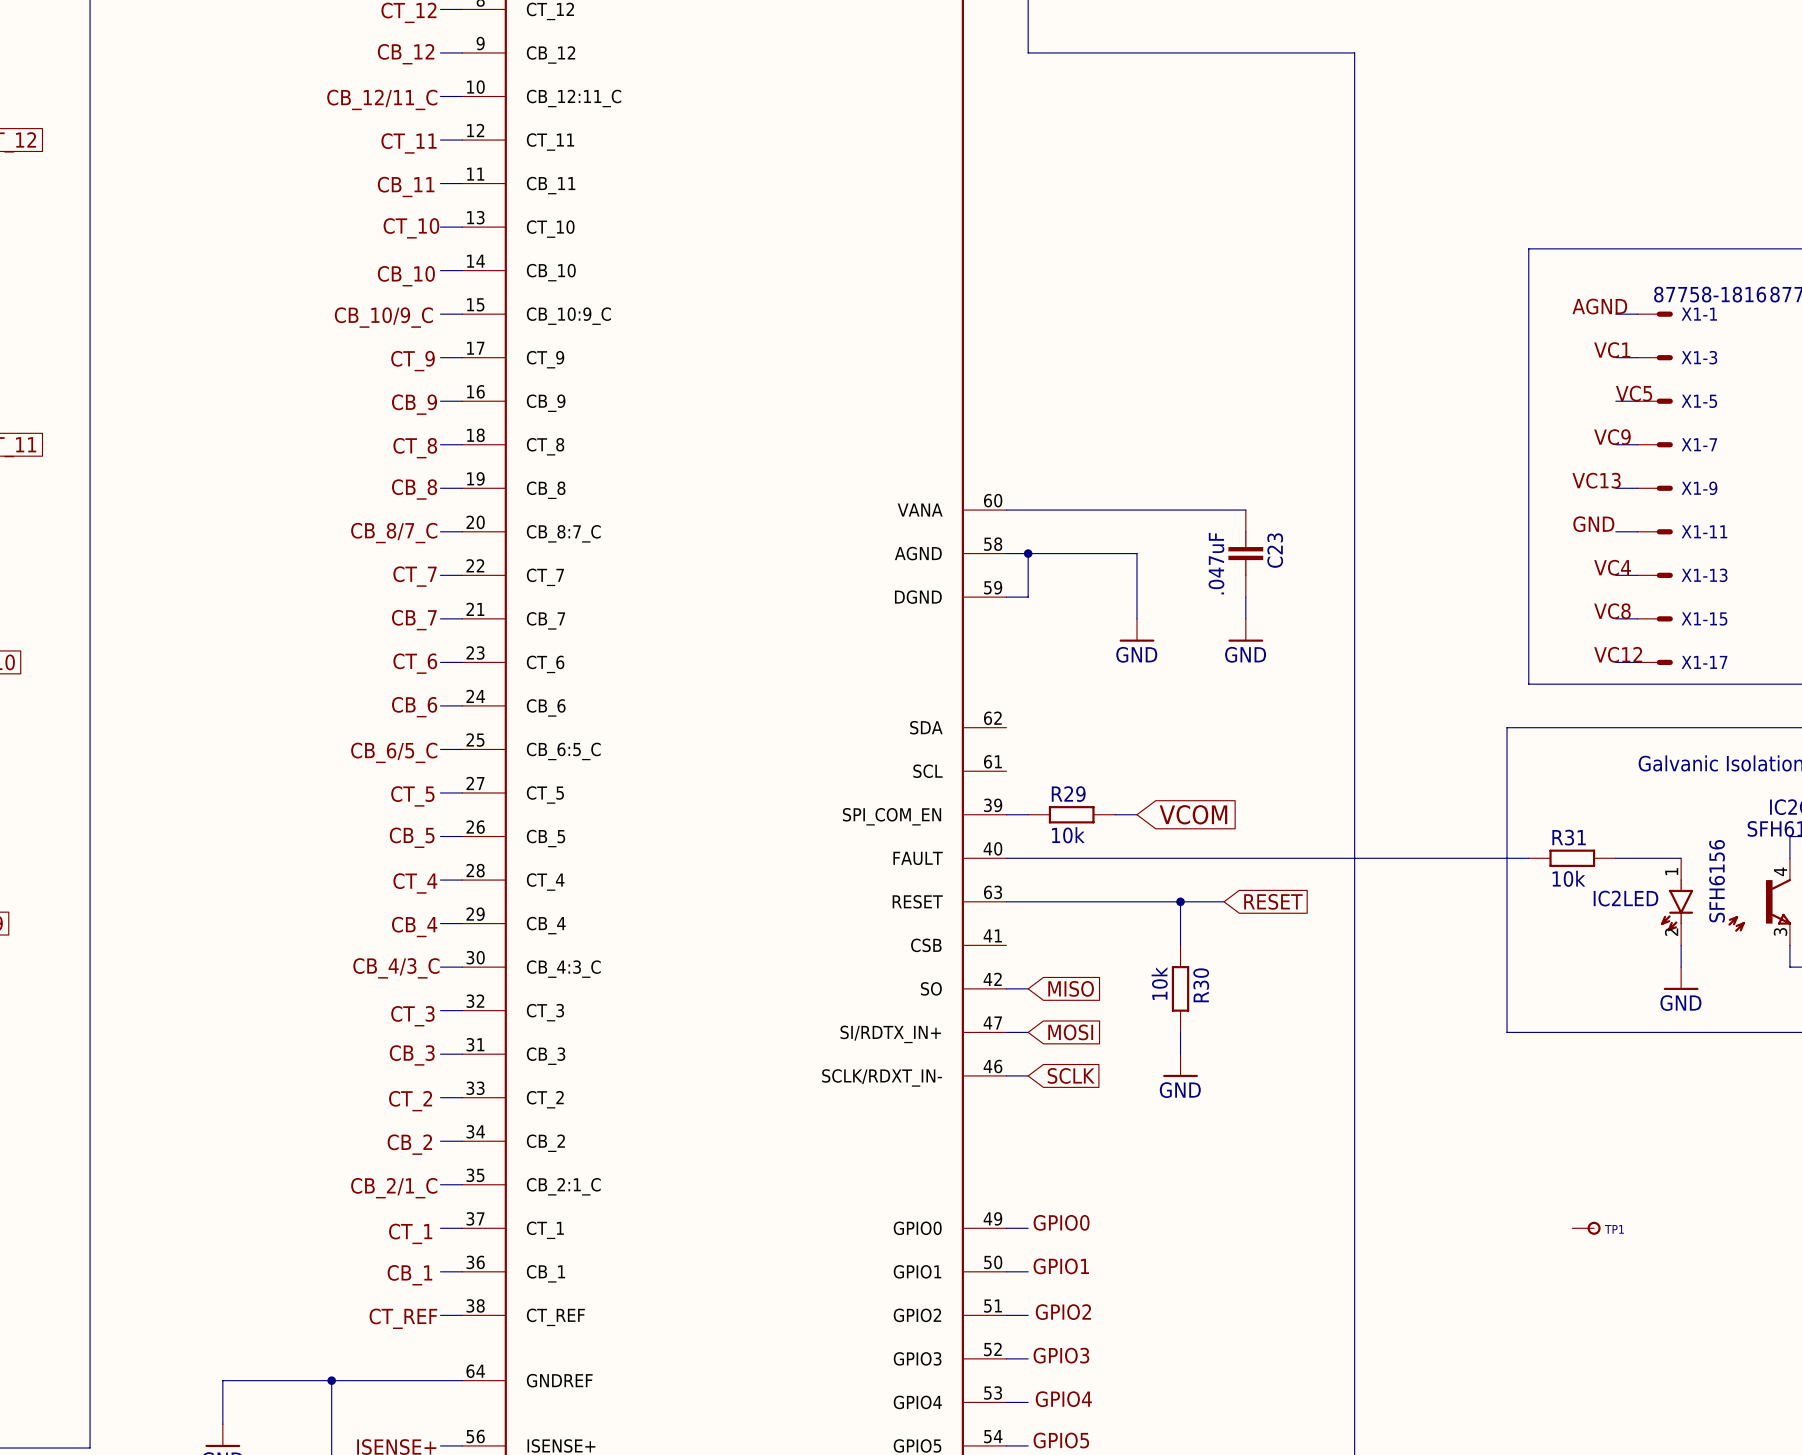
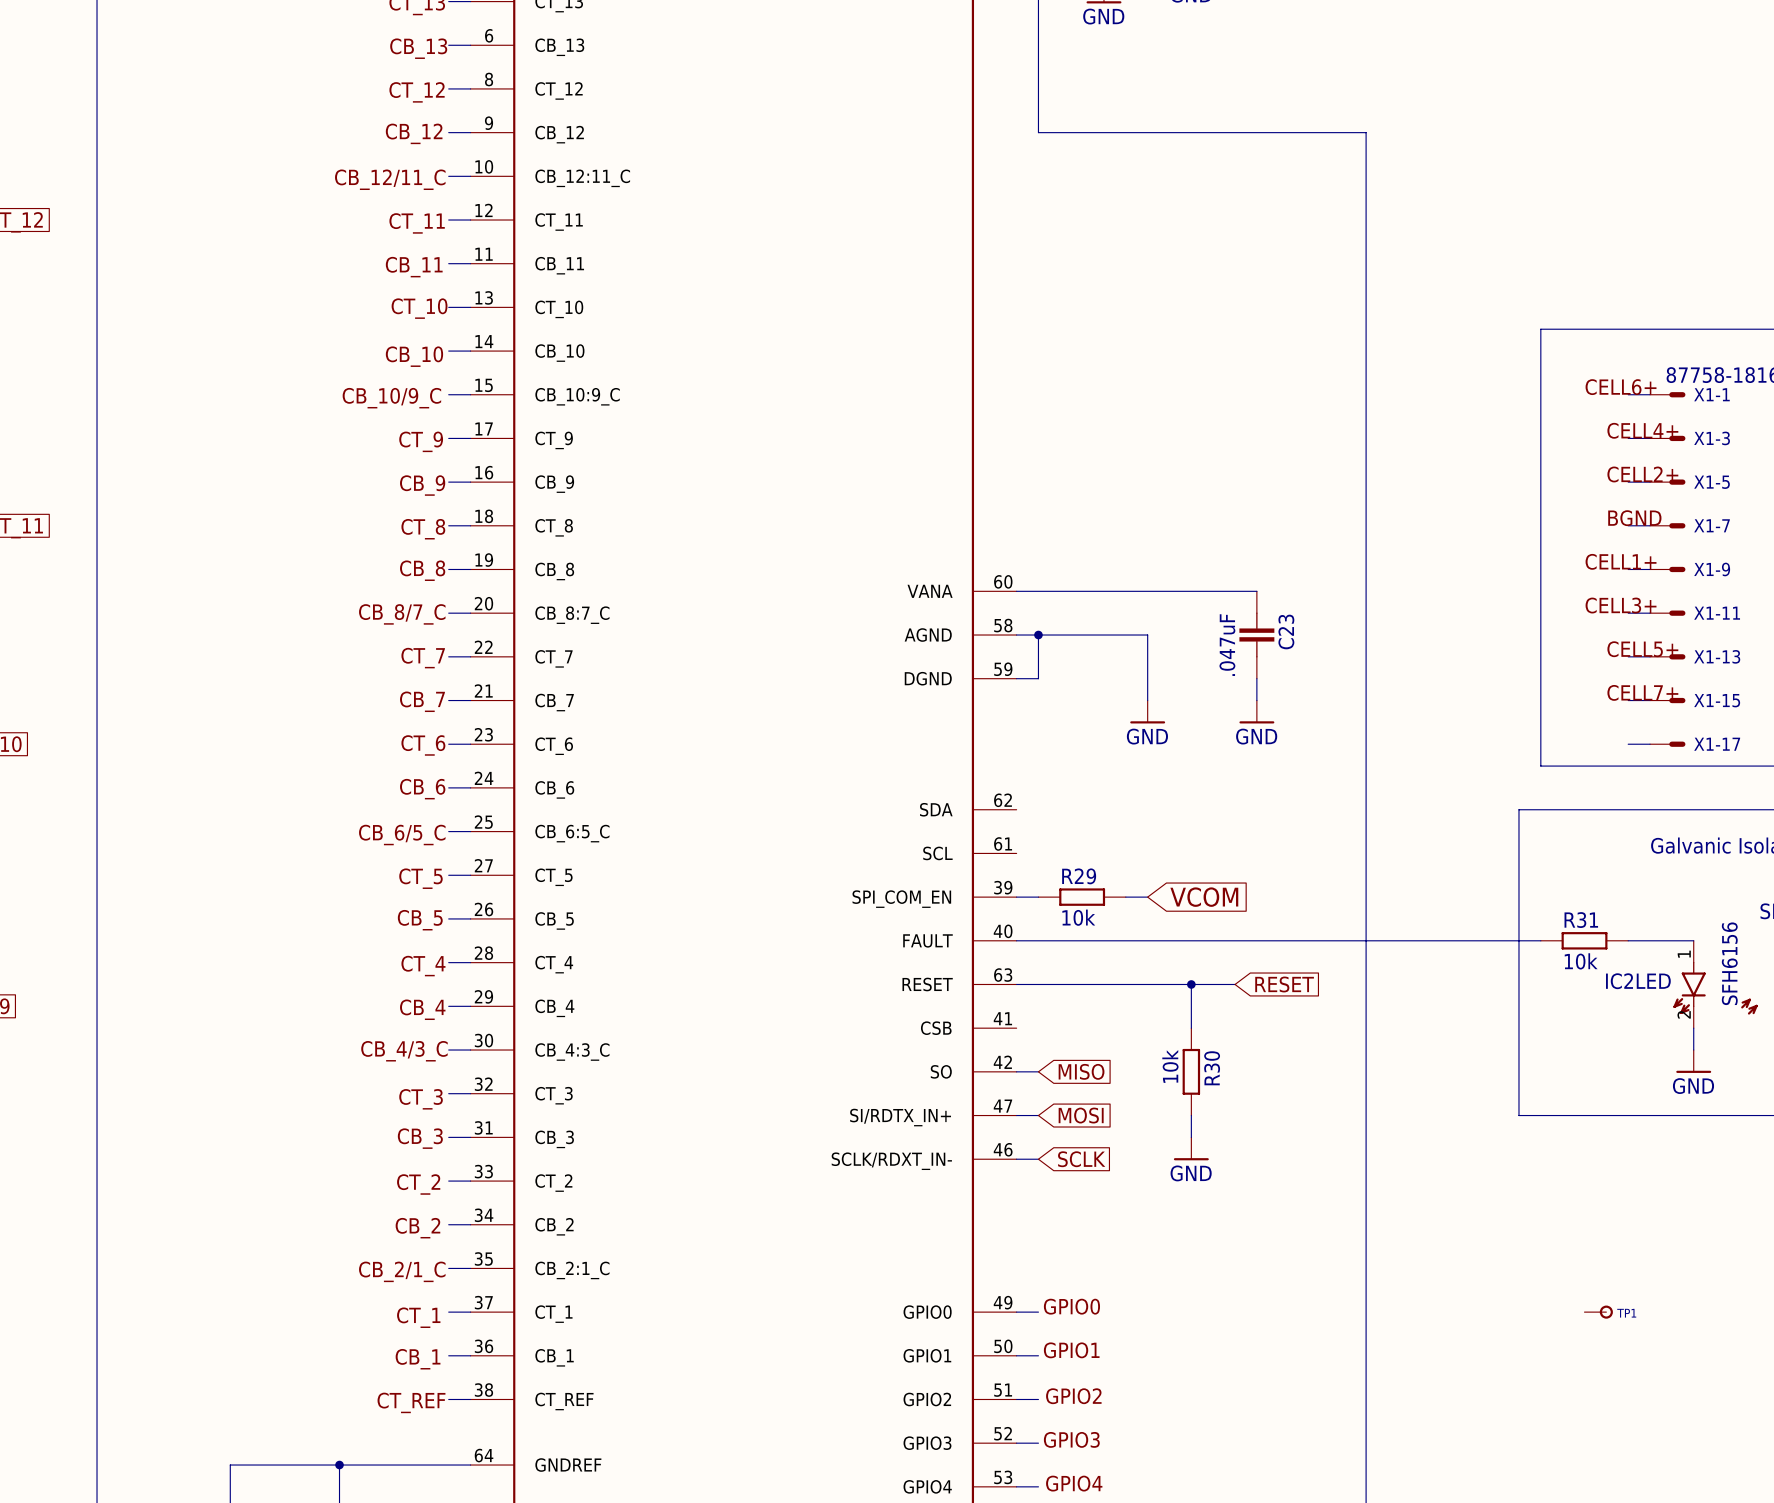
label: AGND (1599, 306) -> CELL6+ (1621, 387)
label: VC1 (1612, 350) -> CELL4+ (1642, 430)
label: none -> CELL2+ (1642, 474)
label: VC5 (1634, 393) -> none
label: VC9 (1612, 437) -> BGND (1634, 518)
label: VC13 (1596, 480) -> CELL1+ (1621, 561)
label: GND (1593, 524) -> CELL3+ (1621, 605)
label: VC4 (1612, 567) -> CELL5+ (1642, 649)
label: VC8 (1612, 611) -> CELL7+ (1642, 692)
label: VC12 (1618, 654) -> none

